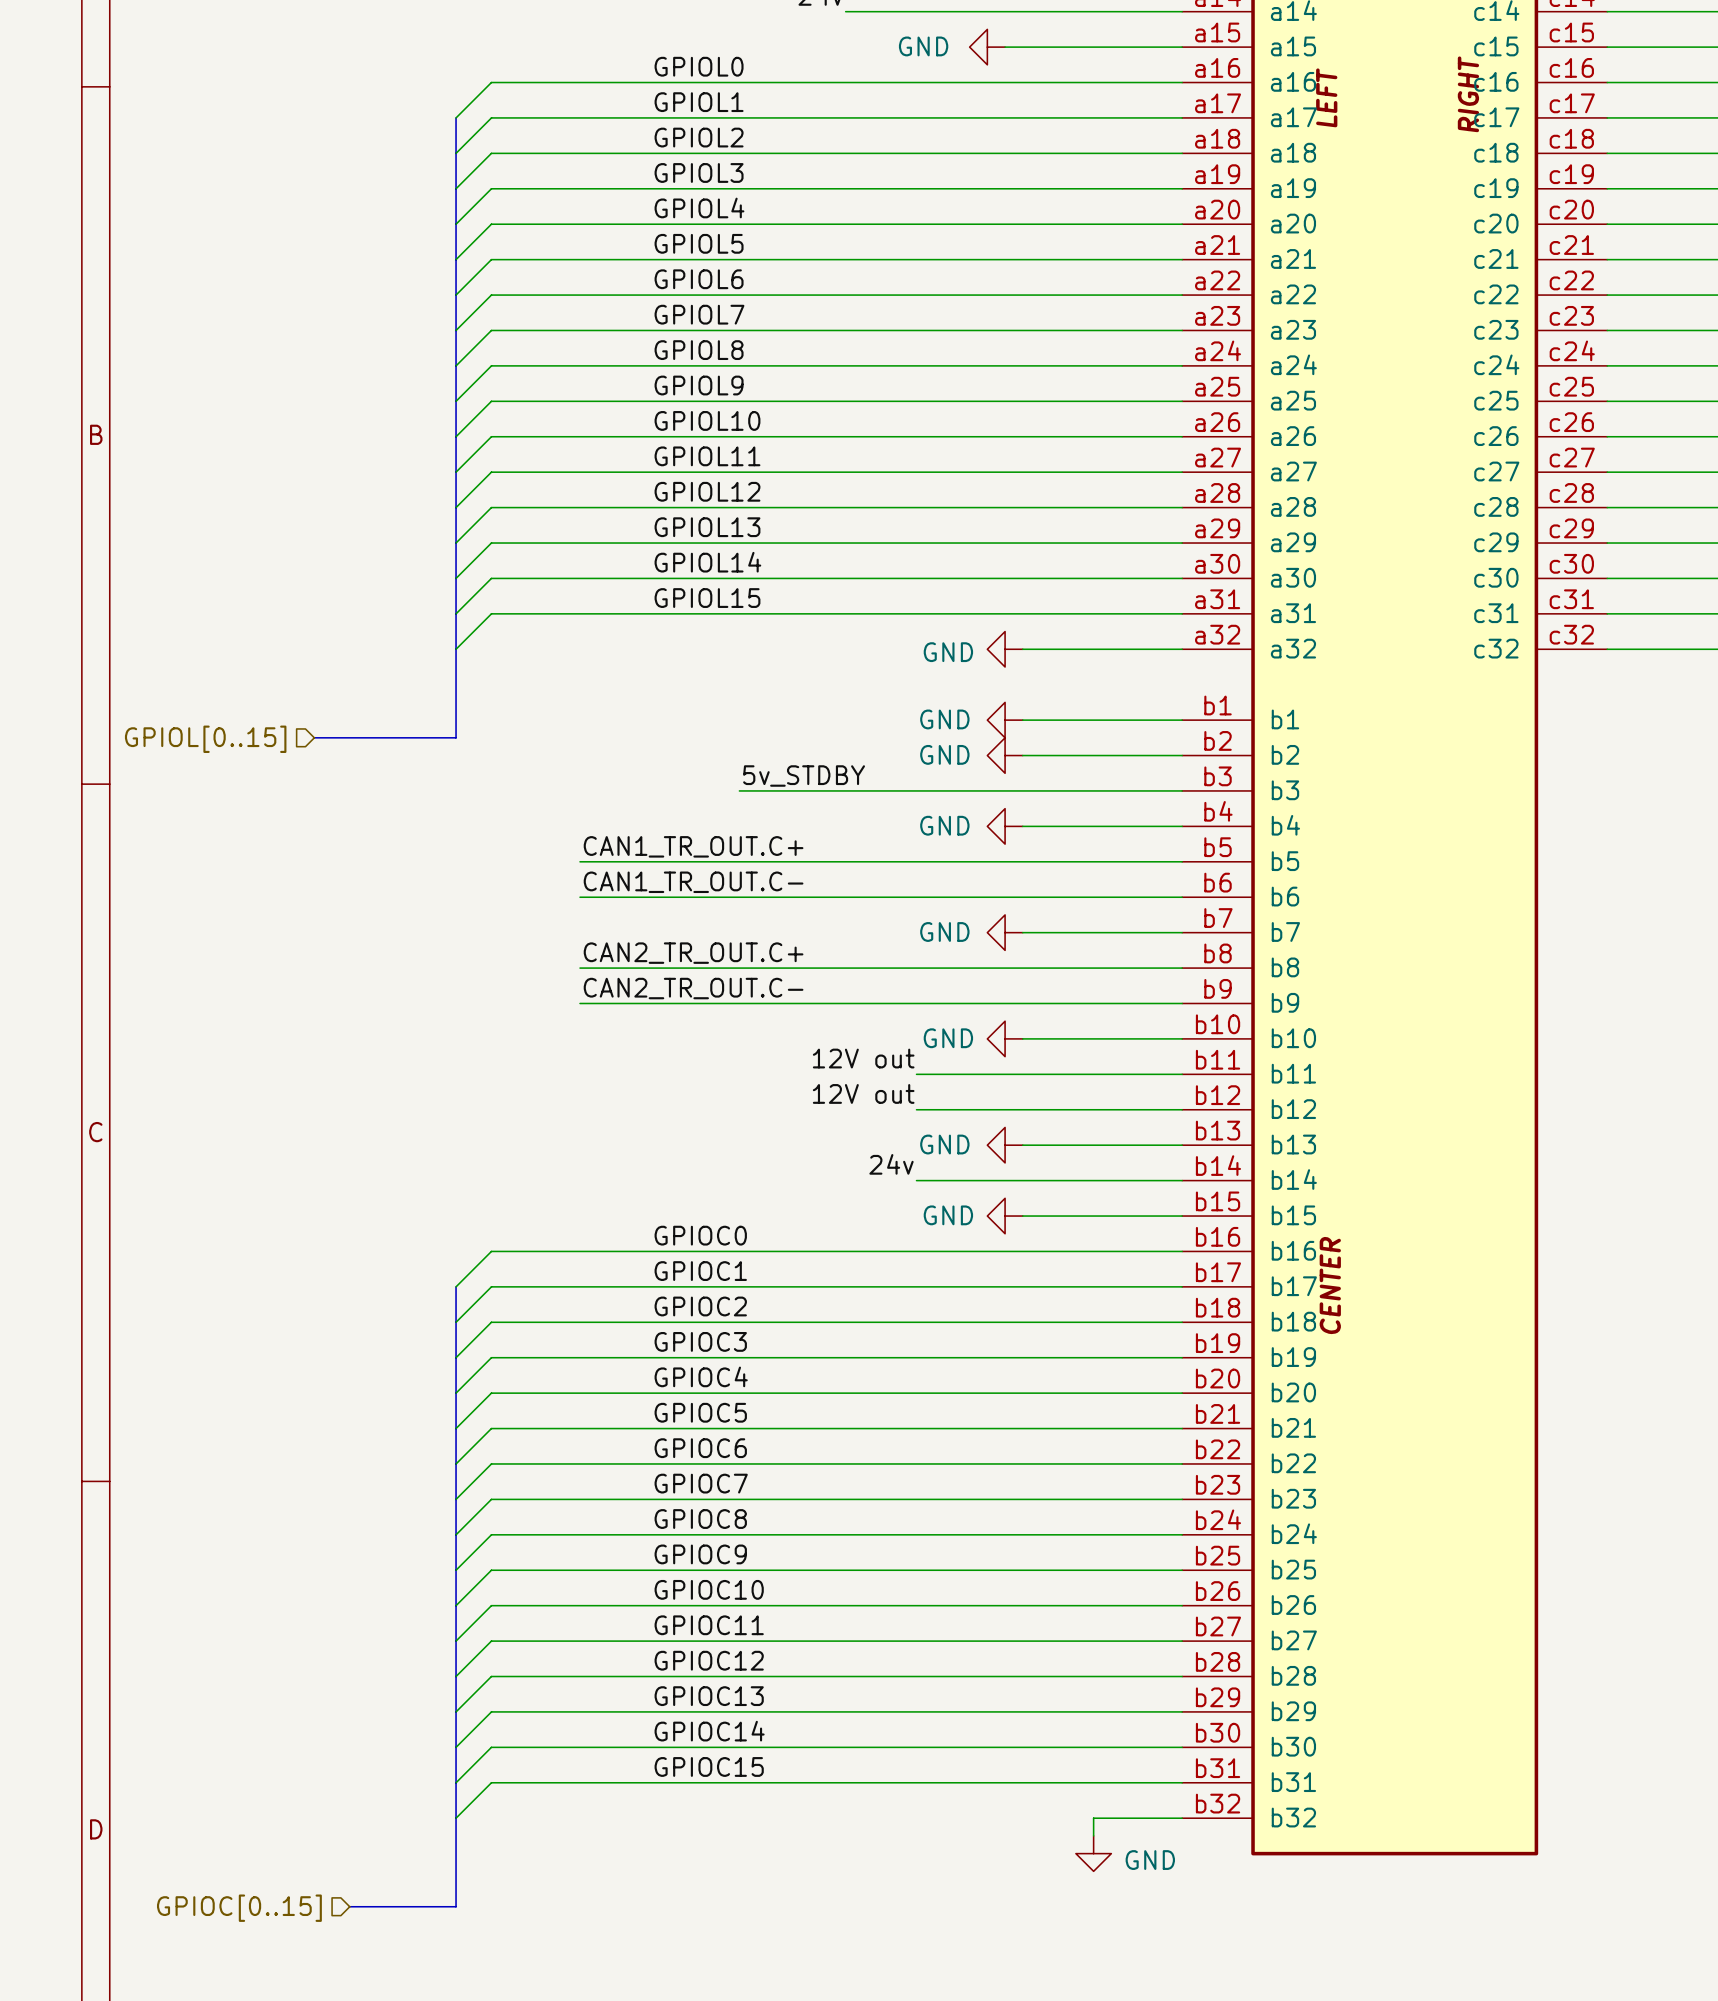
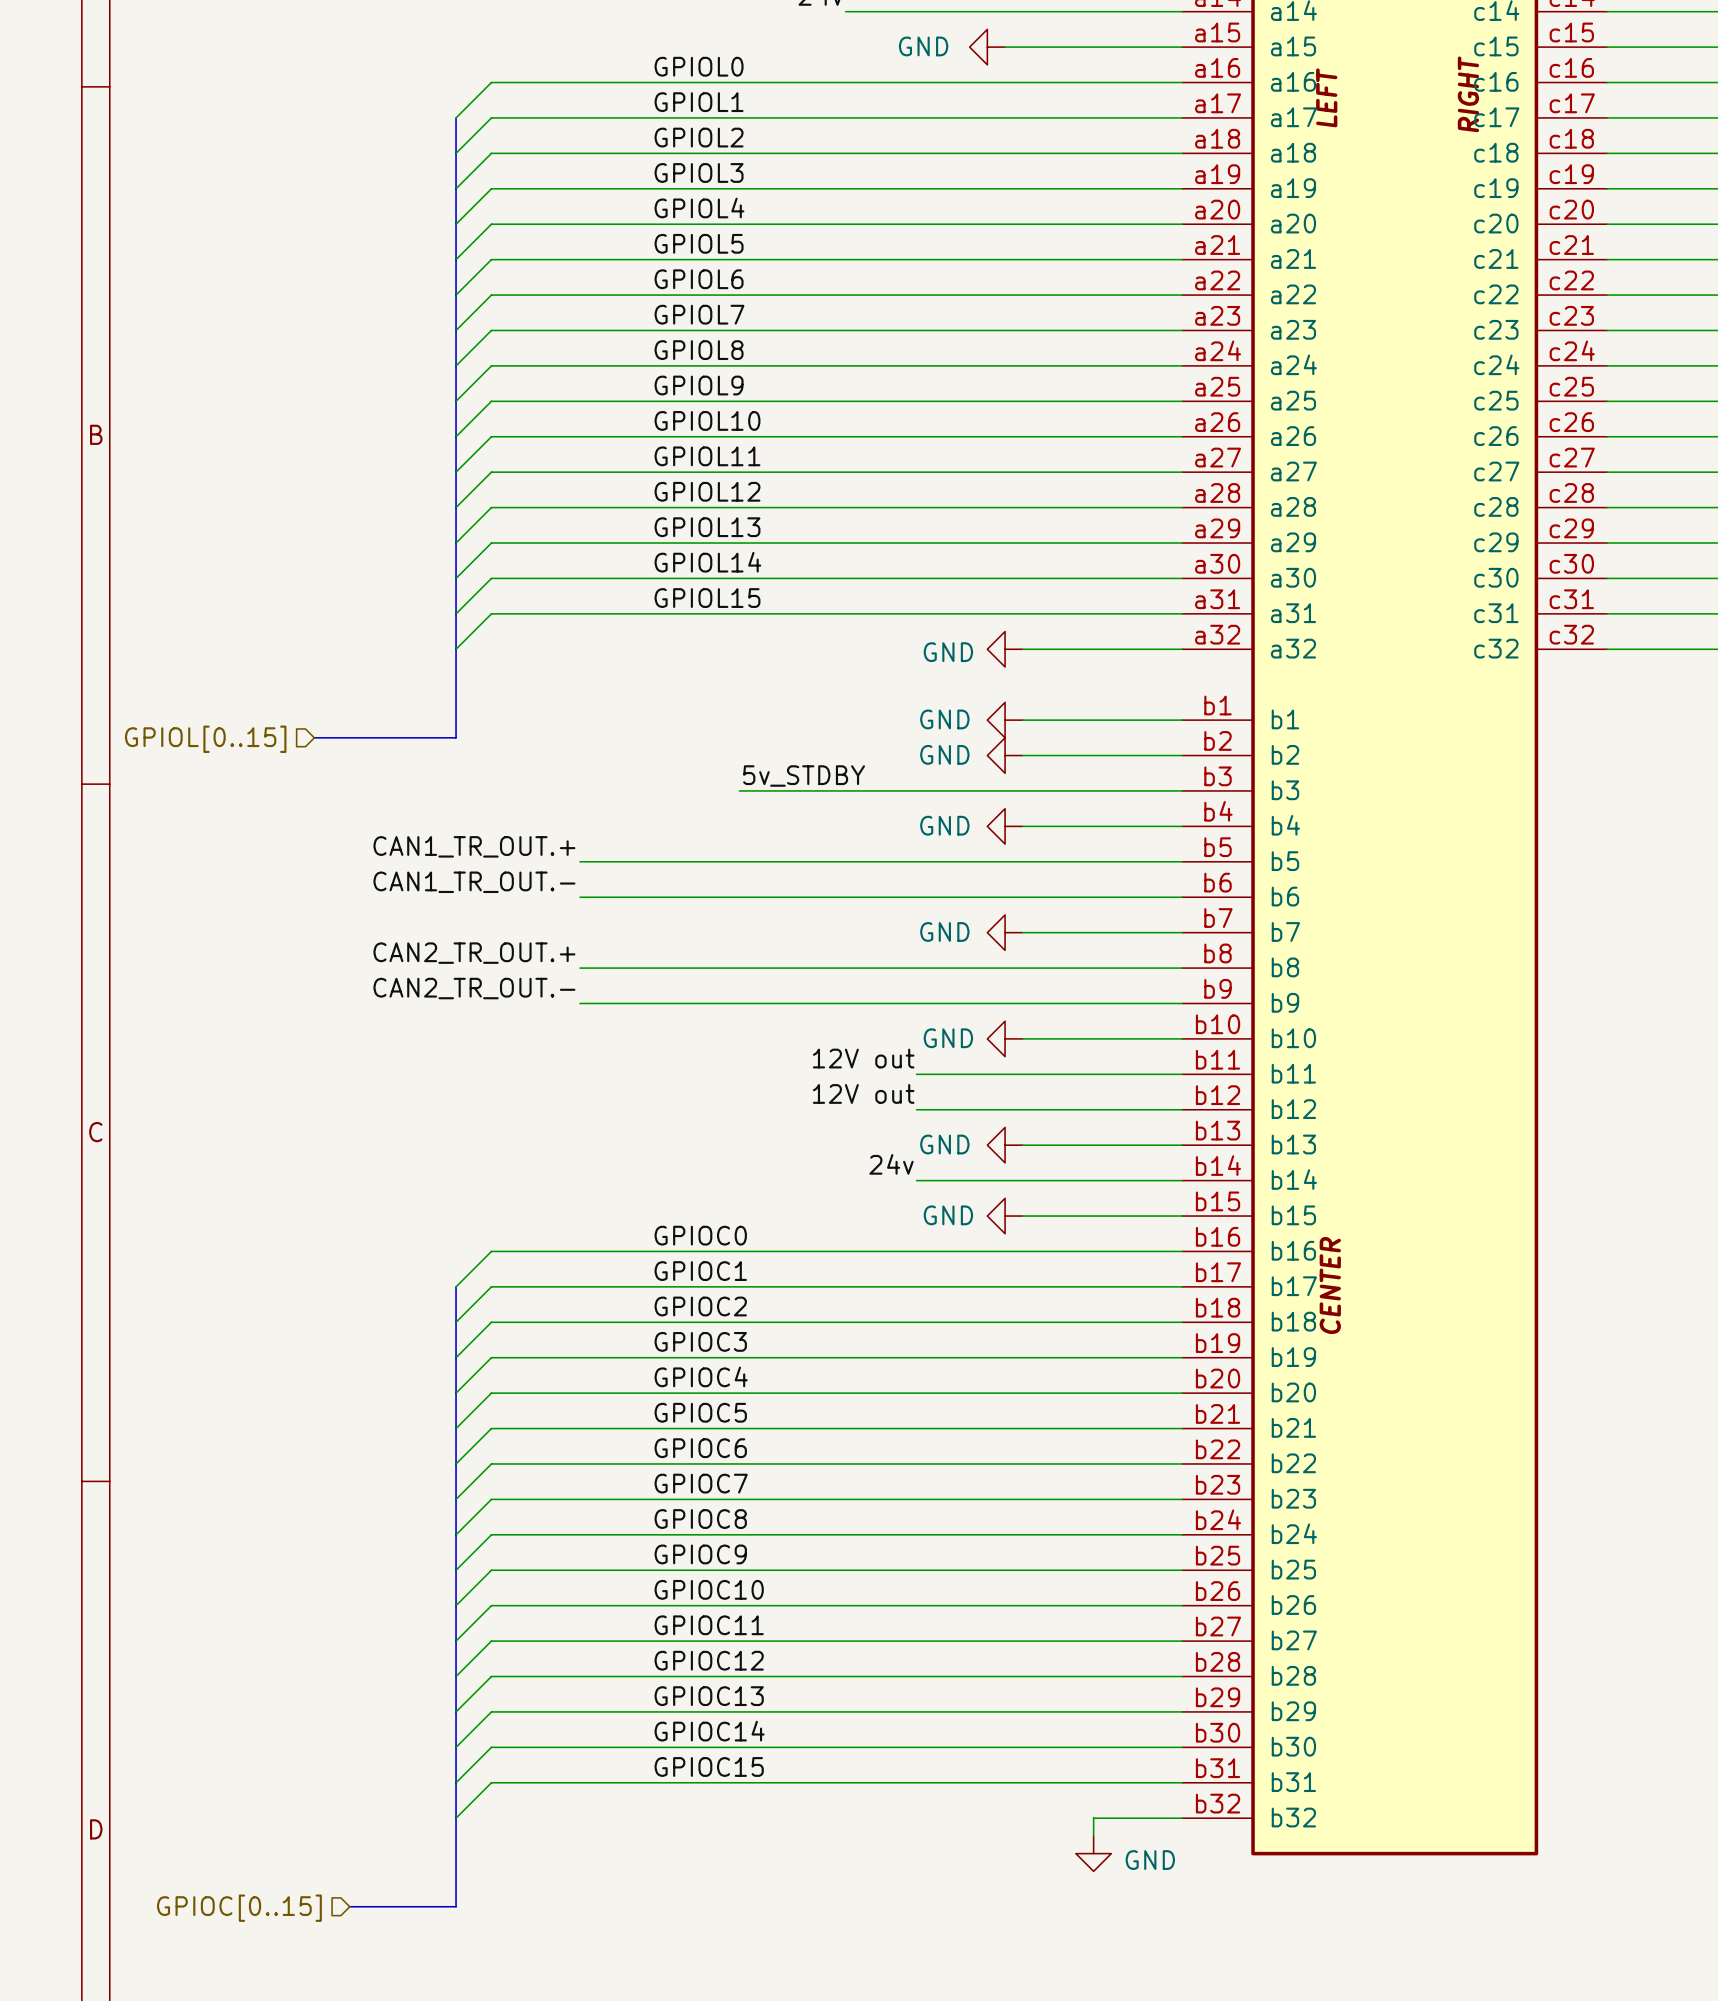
label: CAN1_TR_OUT.C+ (693, 846) -> CAN1_TR_OUT.+ (474, 846)
label: CAN1_TR_OUT.C- (693, 882) -> CAN1_TR_OUT.- (474, 882)
label: CAN2_TR_OUT.C+ (693, 953) -> CAN2_TR_OUT.+ (474, 953)
label: CAN2_TR_OUT.C- (693, 988) -> CAN2_TR_OUT.- (474, 988)

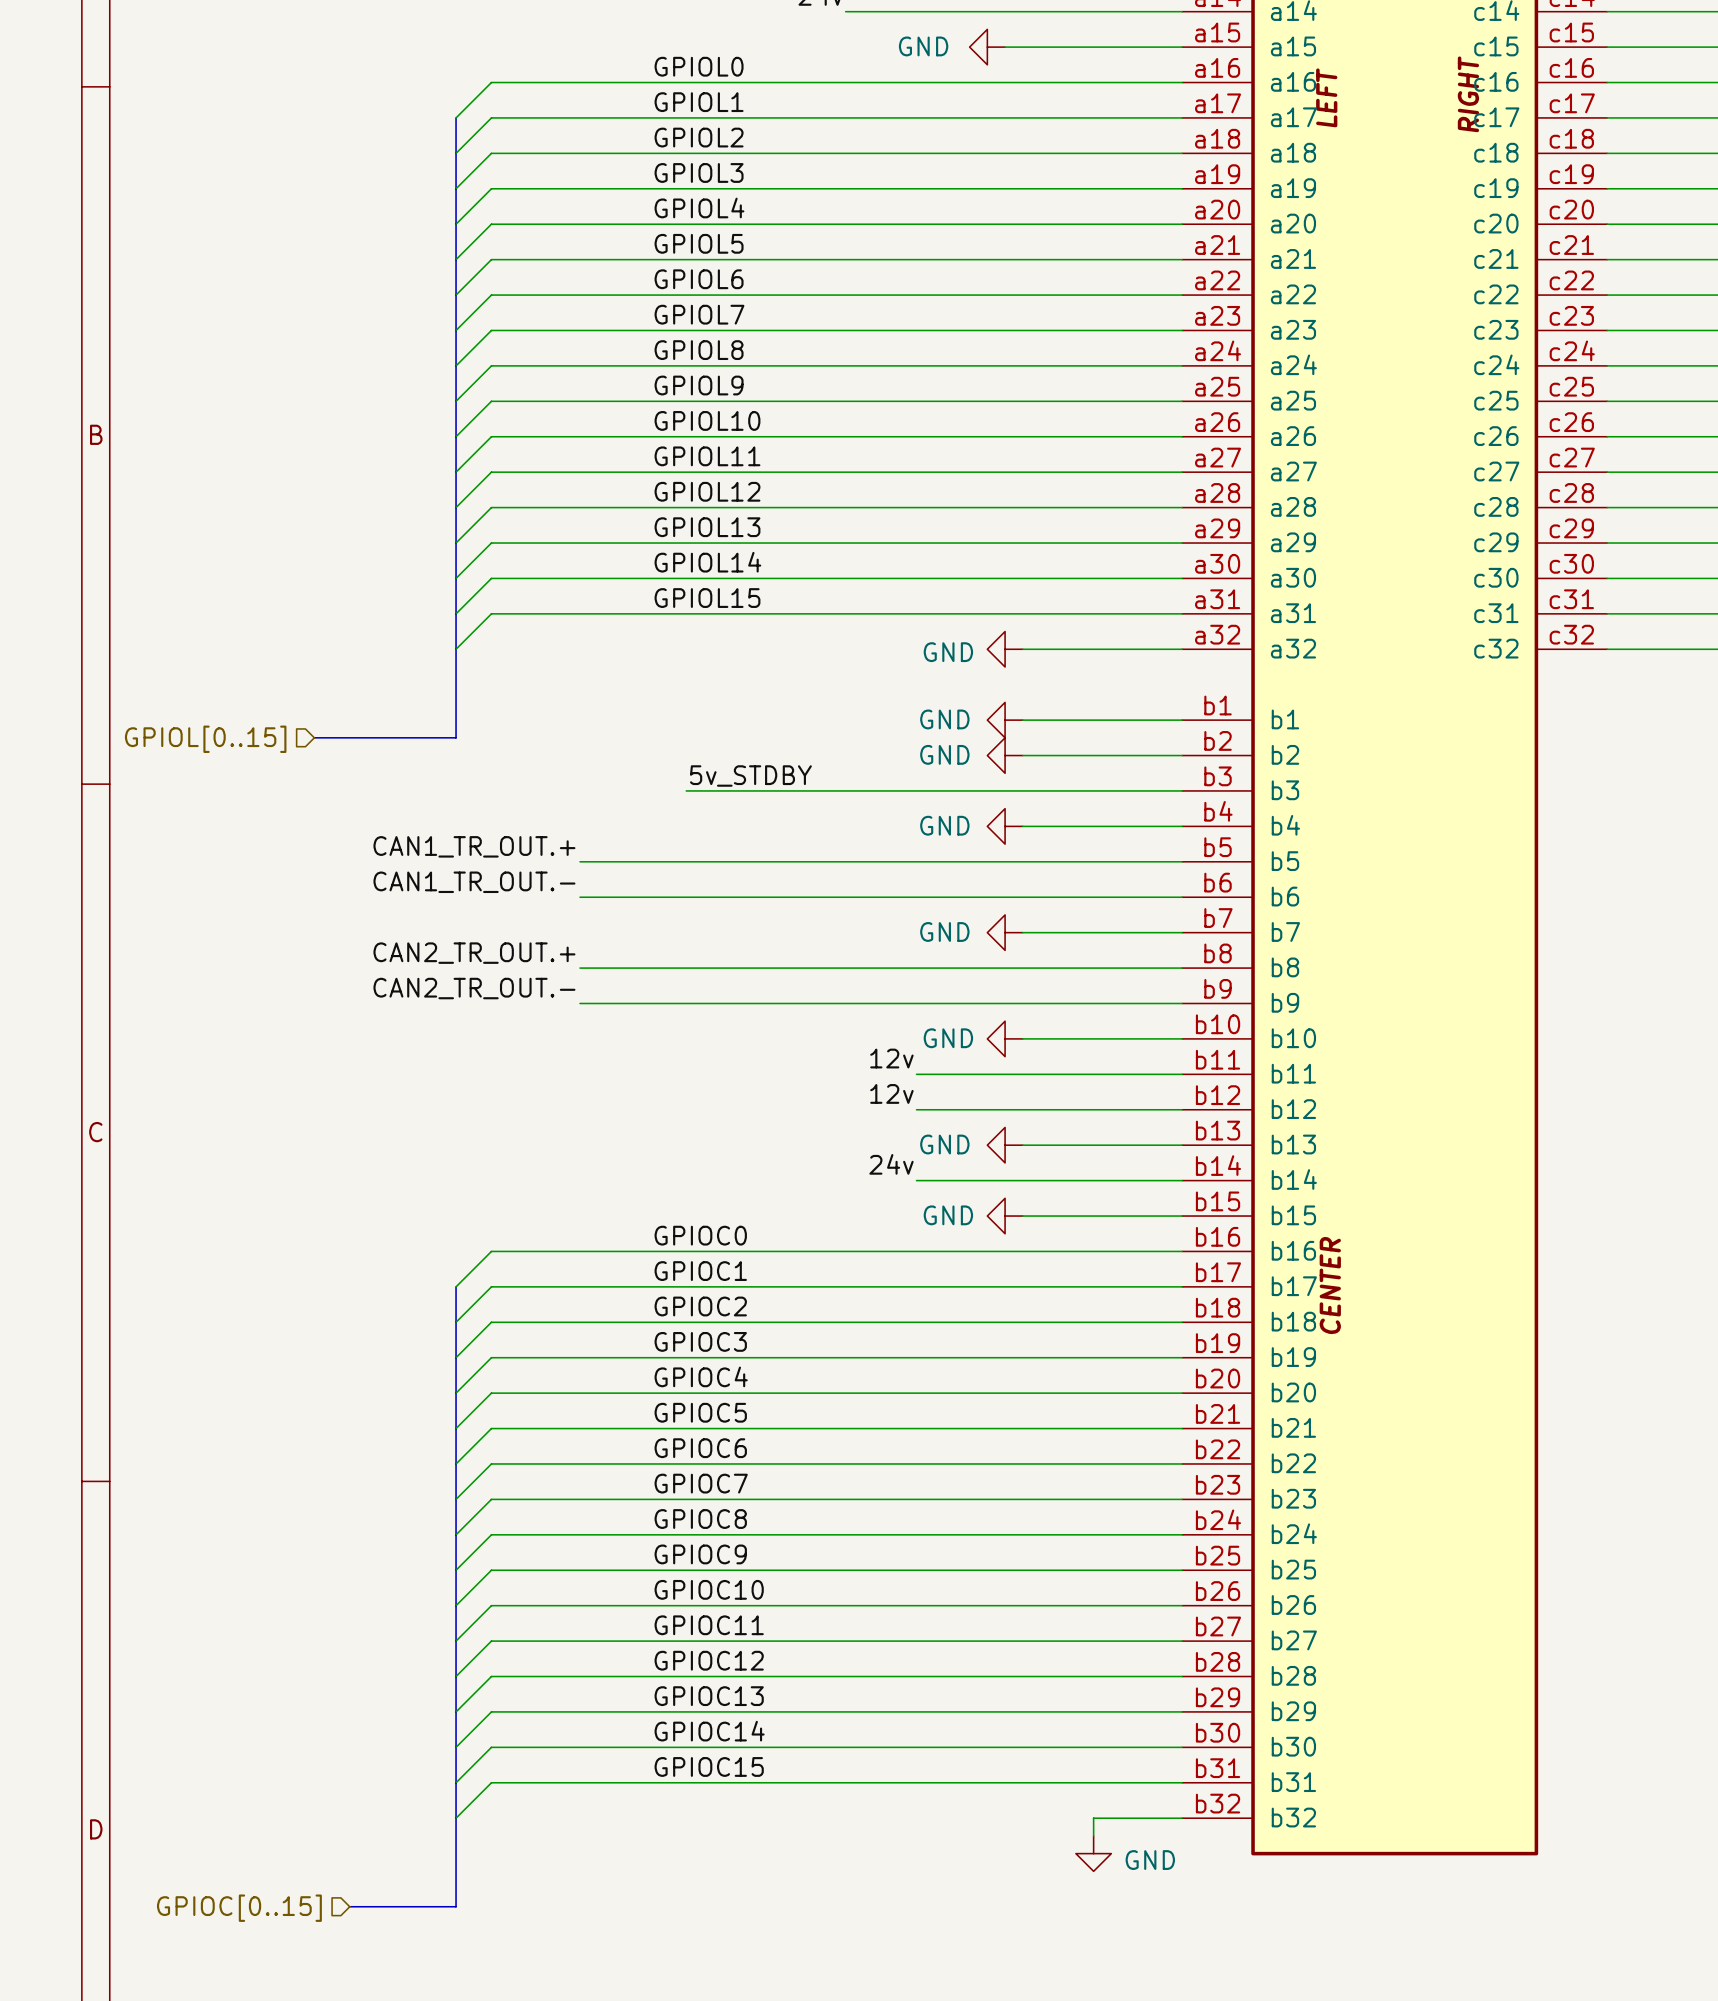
label position: 5v_STDBY (804, 776) -> 5v_STDBY (750, 776)
wire: none -> (686, 790) (739, 790)
label: 12V out (863, 1058) -> 12v (891, 1058)
label: 12V out (863, 1093) -> 12v (891, 1093)

